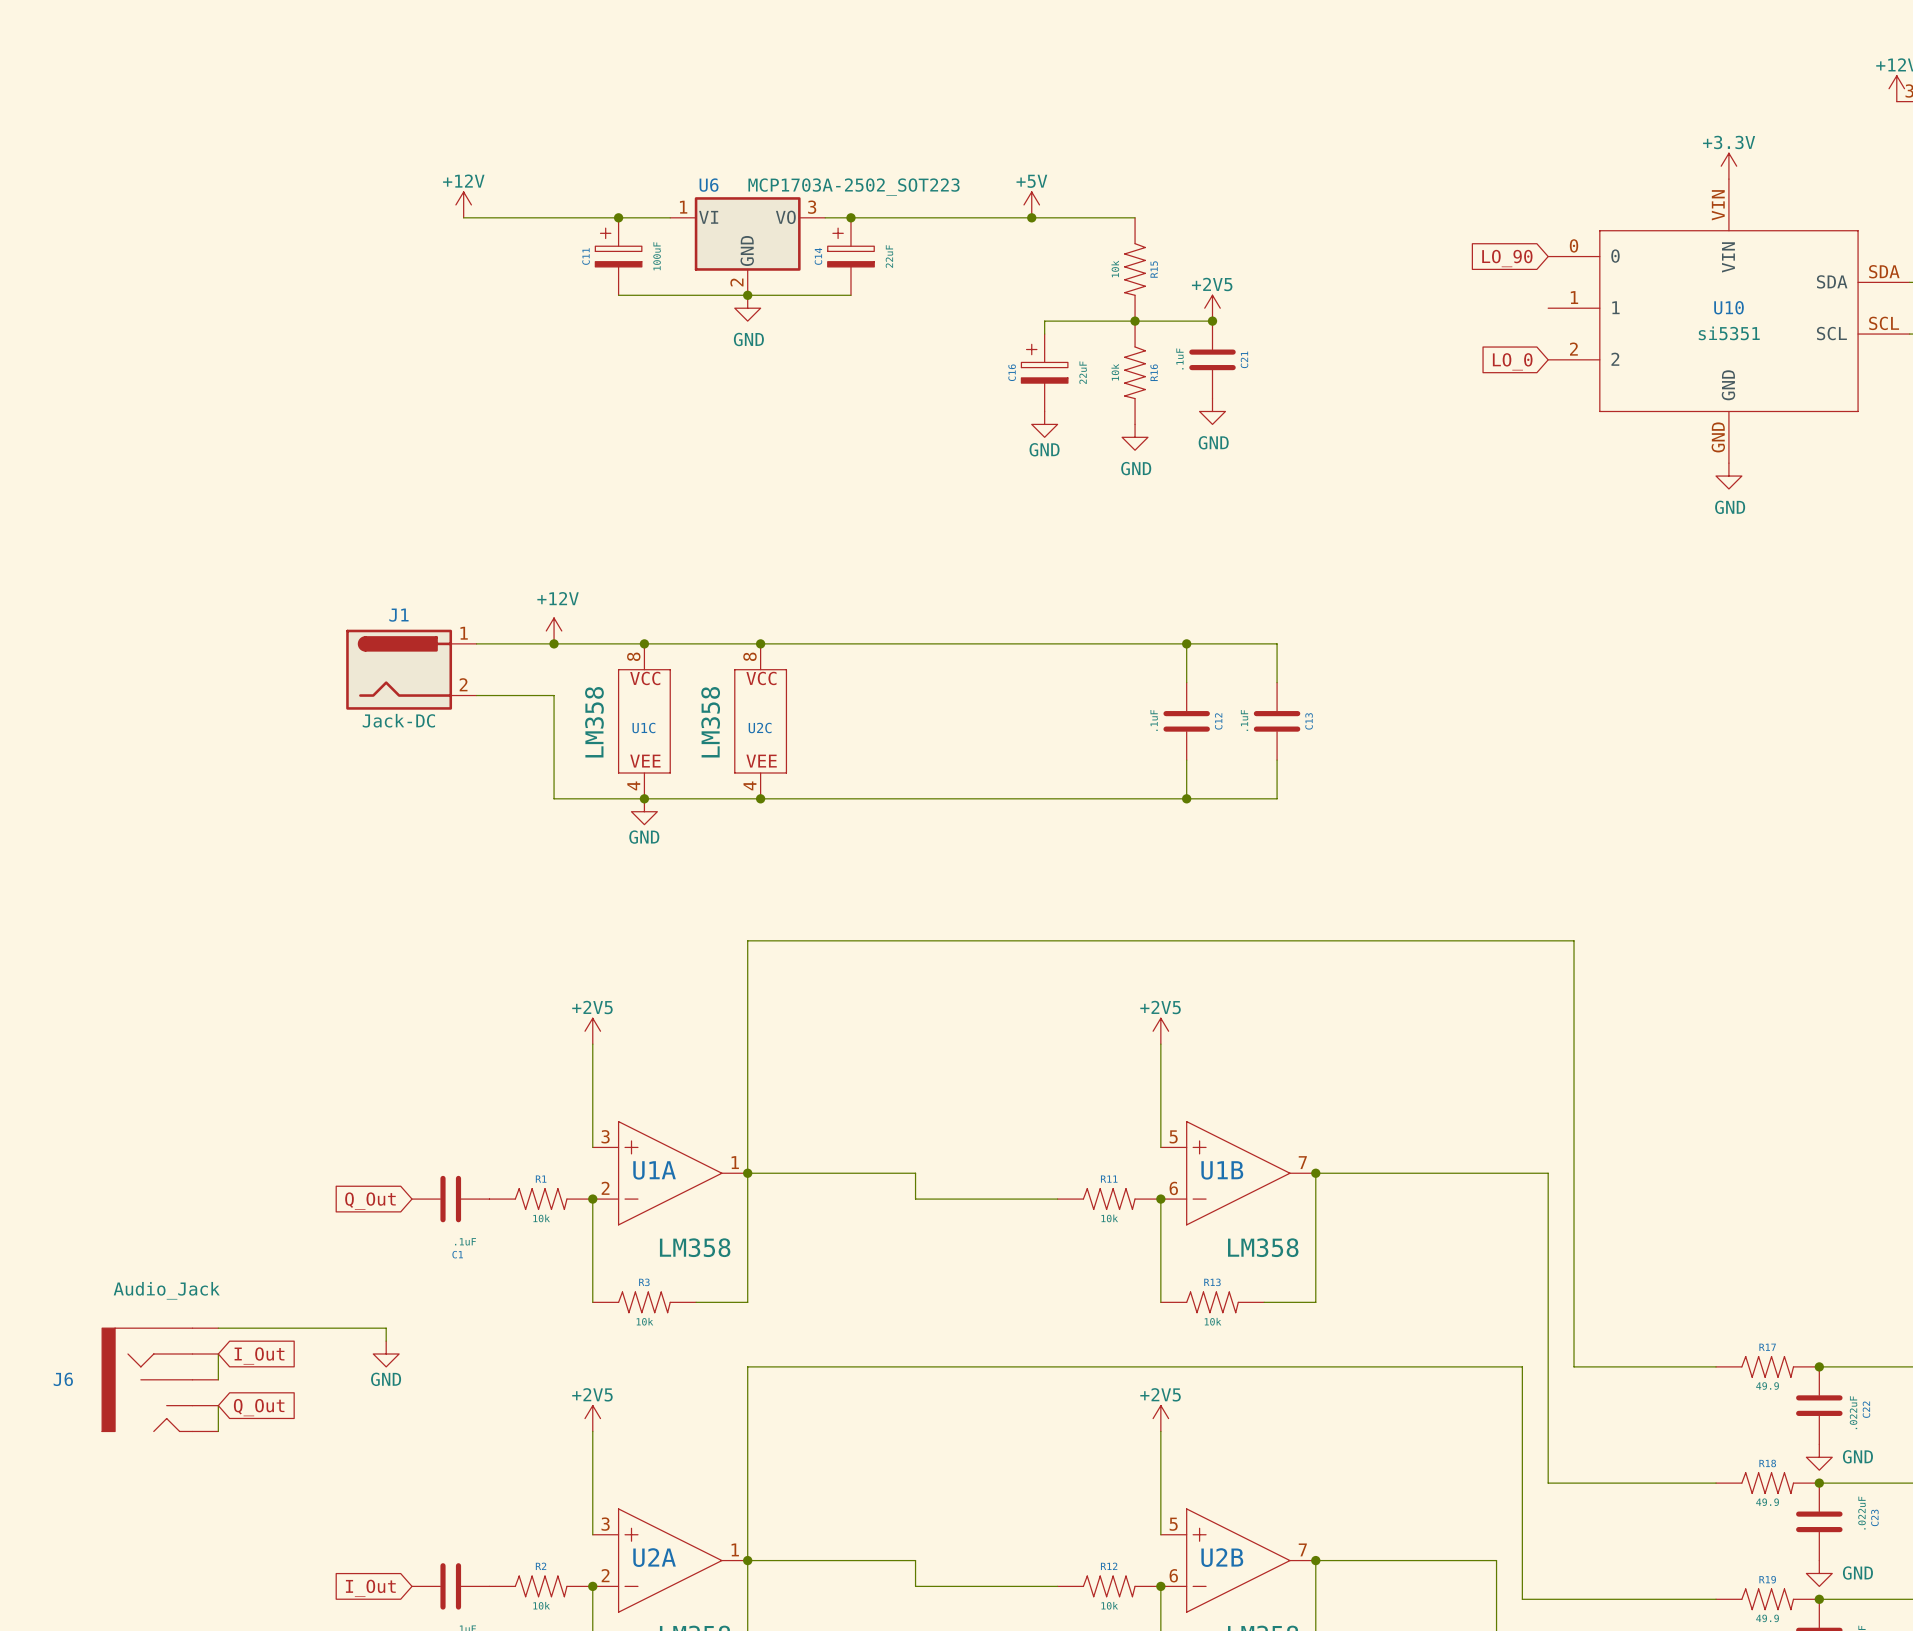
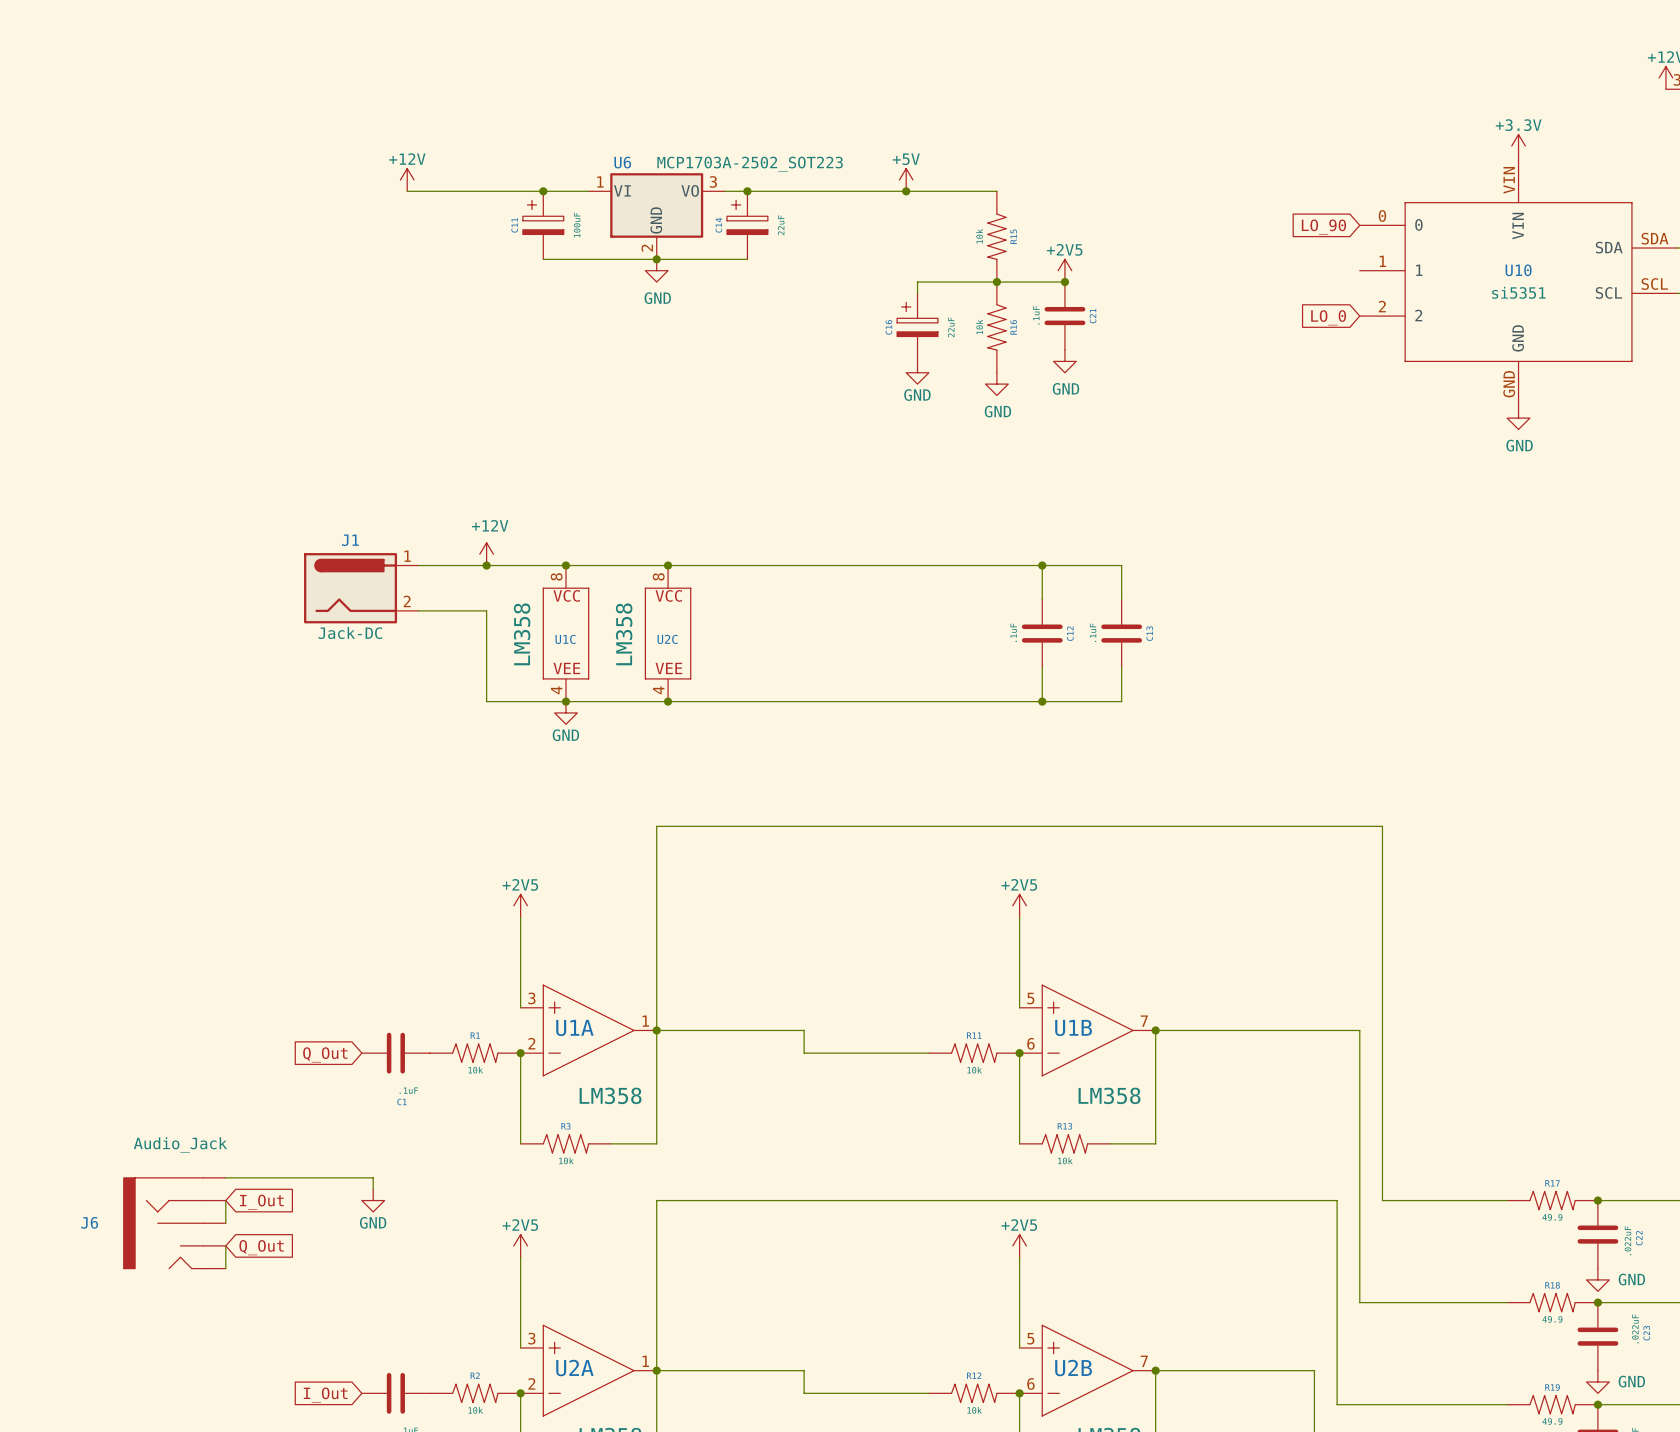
wire: (218, 1328) (386, 1328) (386, 1341) -> (225, 1177) (373, 1177) (373, 1189)
wire: (218, 1353) (218, 1379) -> (225, 1200) (225, 1223)
power symbol position: GND (386, 1353) -> GND (373, 1200)
global label position: I_Out (259, 1355) -> I_Out (261, 1202)
J6 position: (160, 1379) -> (174, 1223)
wire: (218, 1405) (218, 1431) -> (225, 1245) (225, 1268)
global label position: Q_Out (259, 1407) -> Q_Out (261, 1247)

